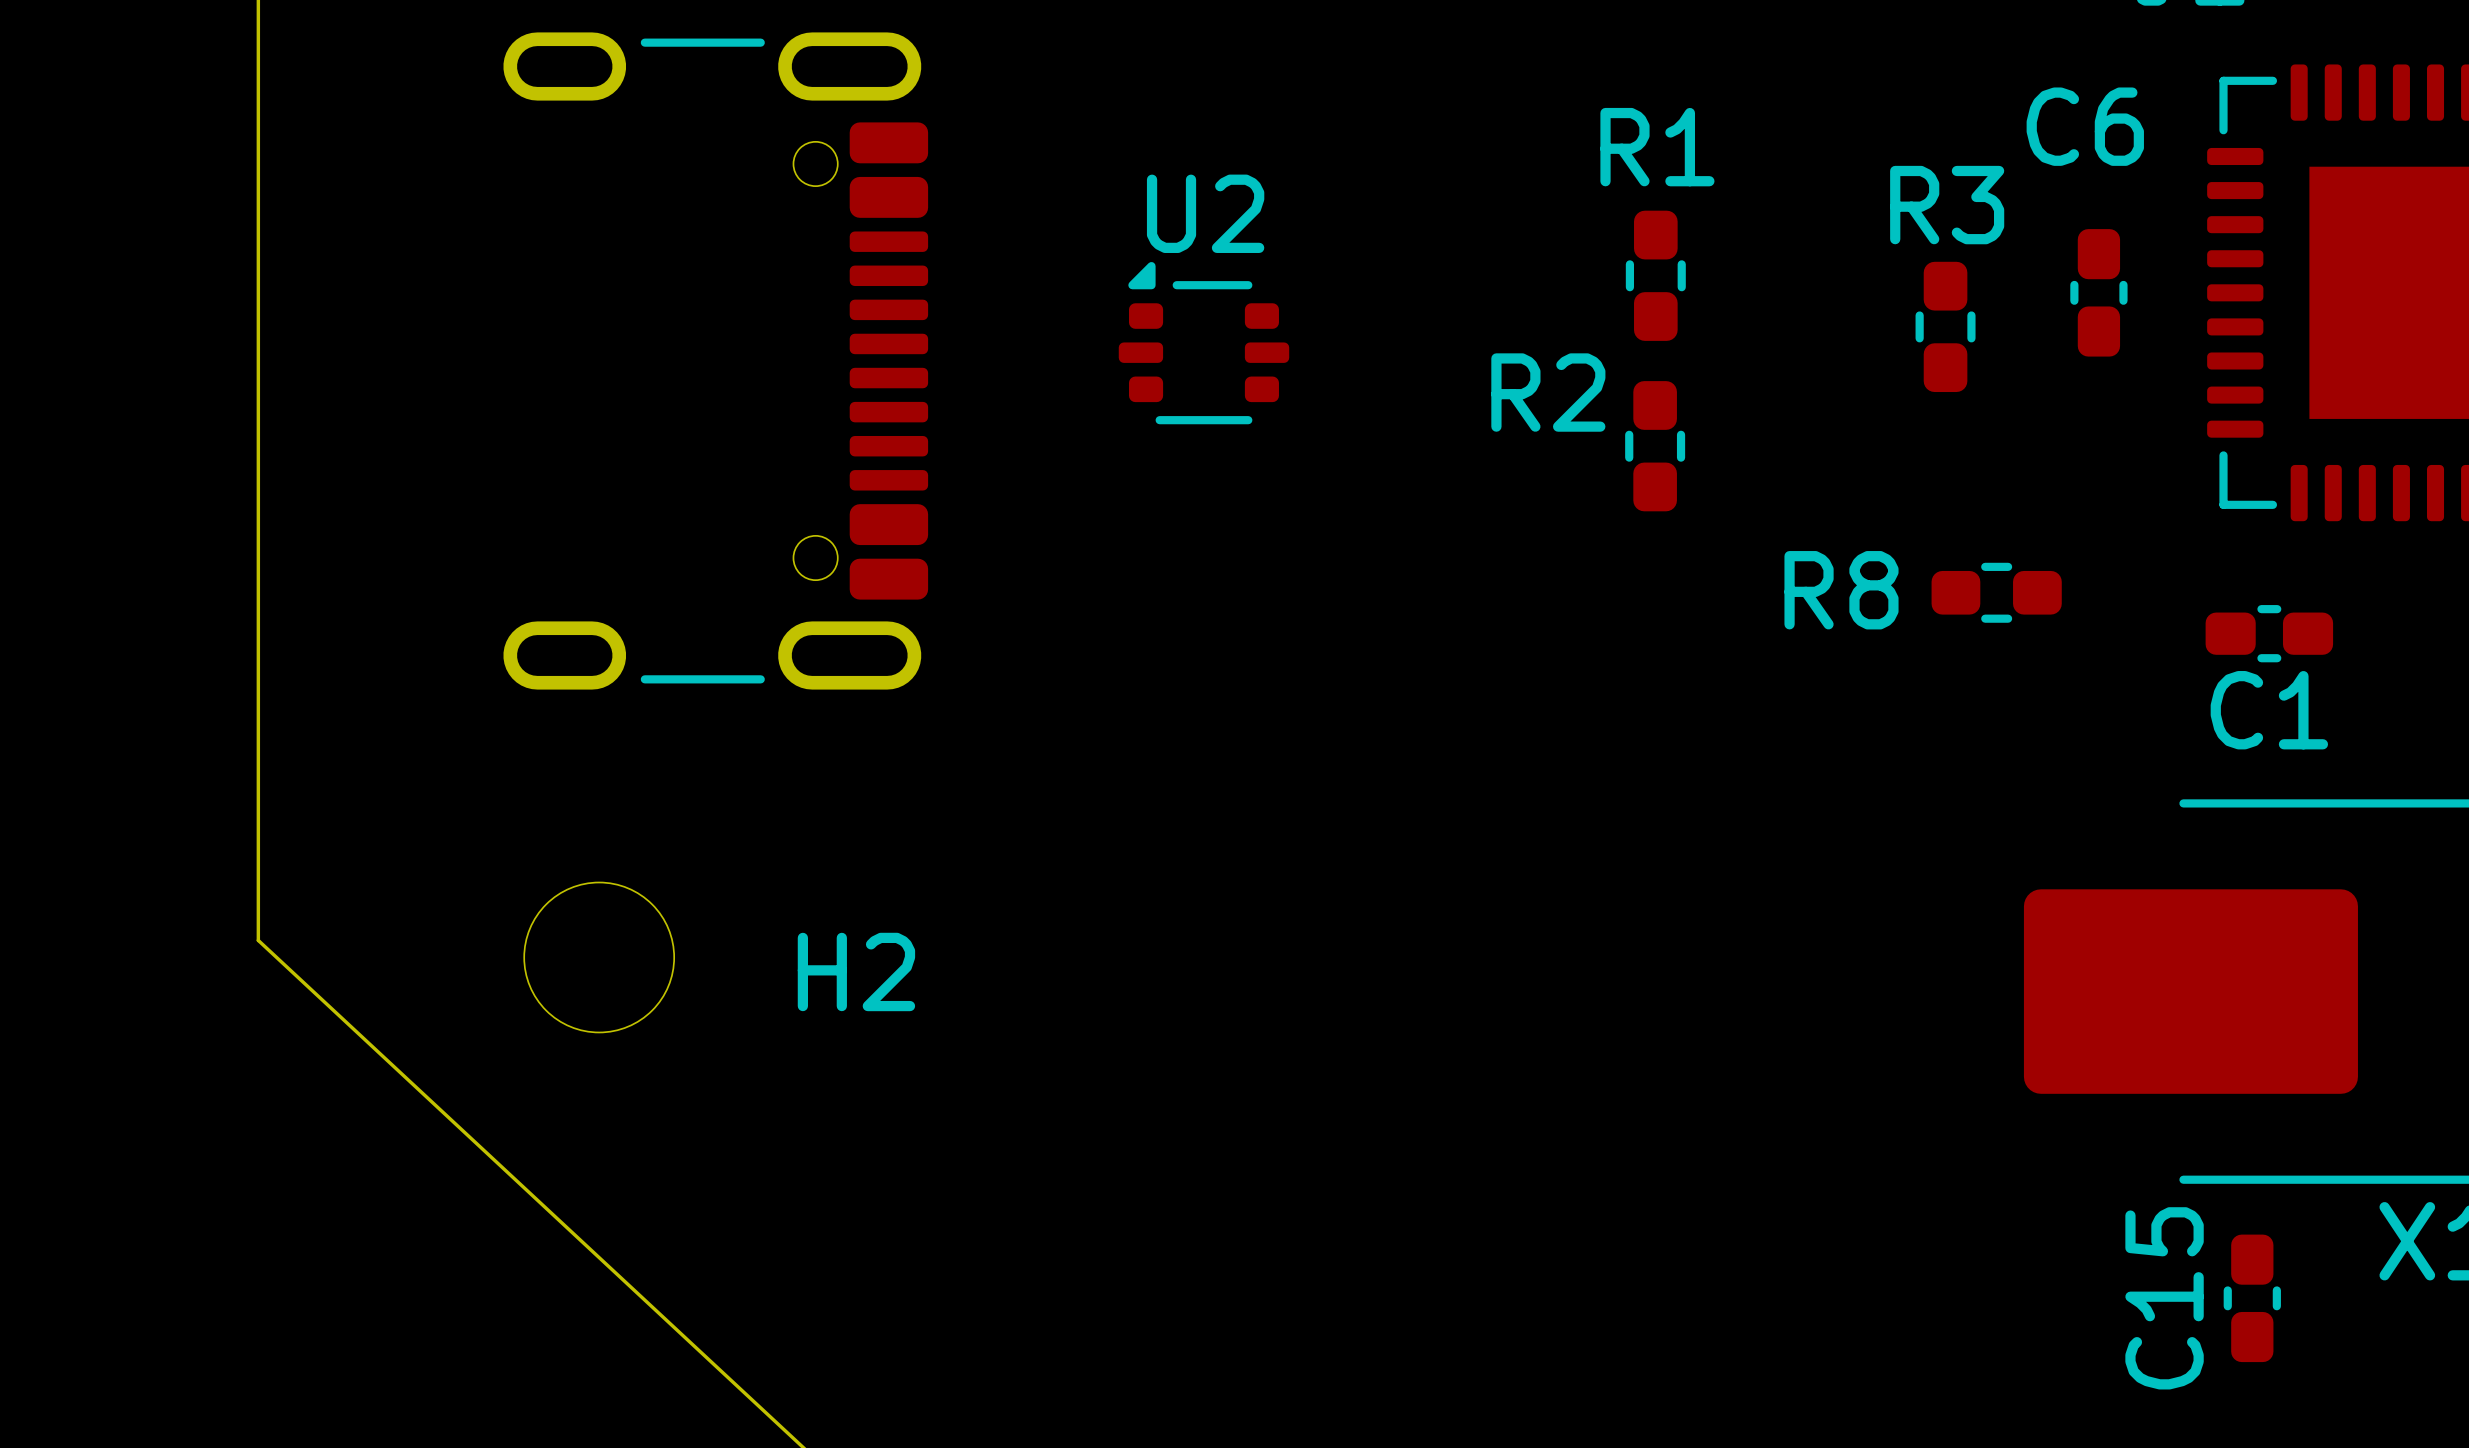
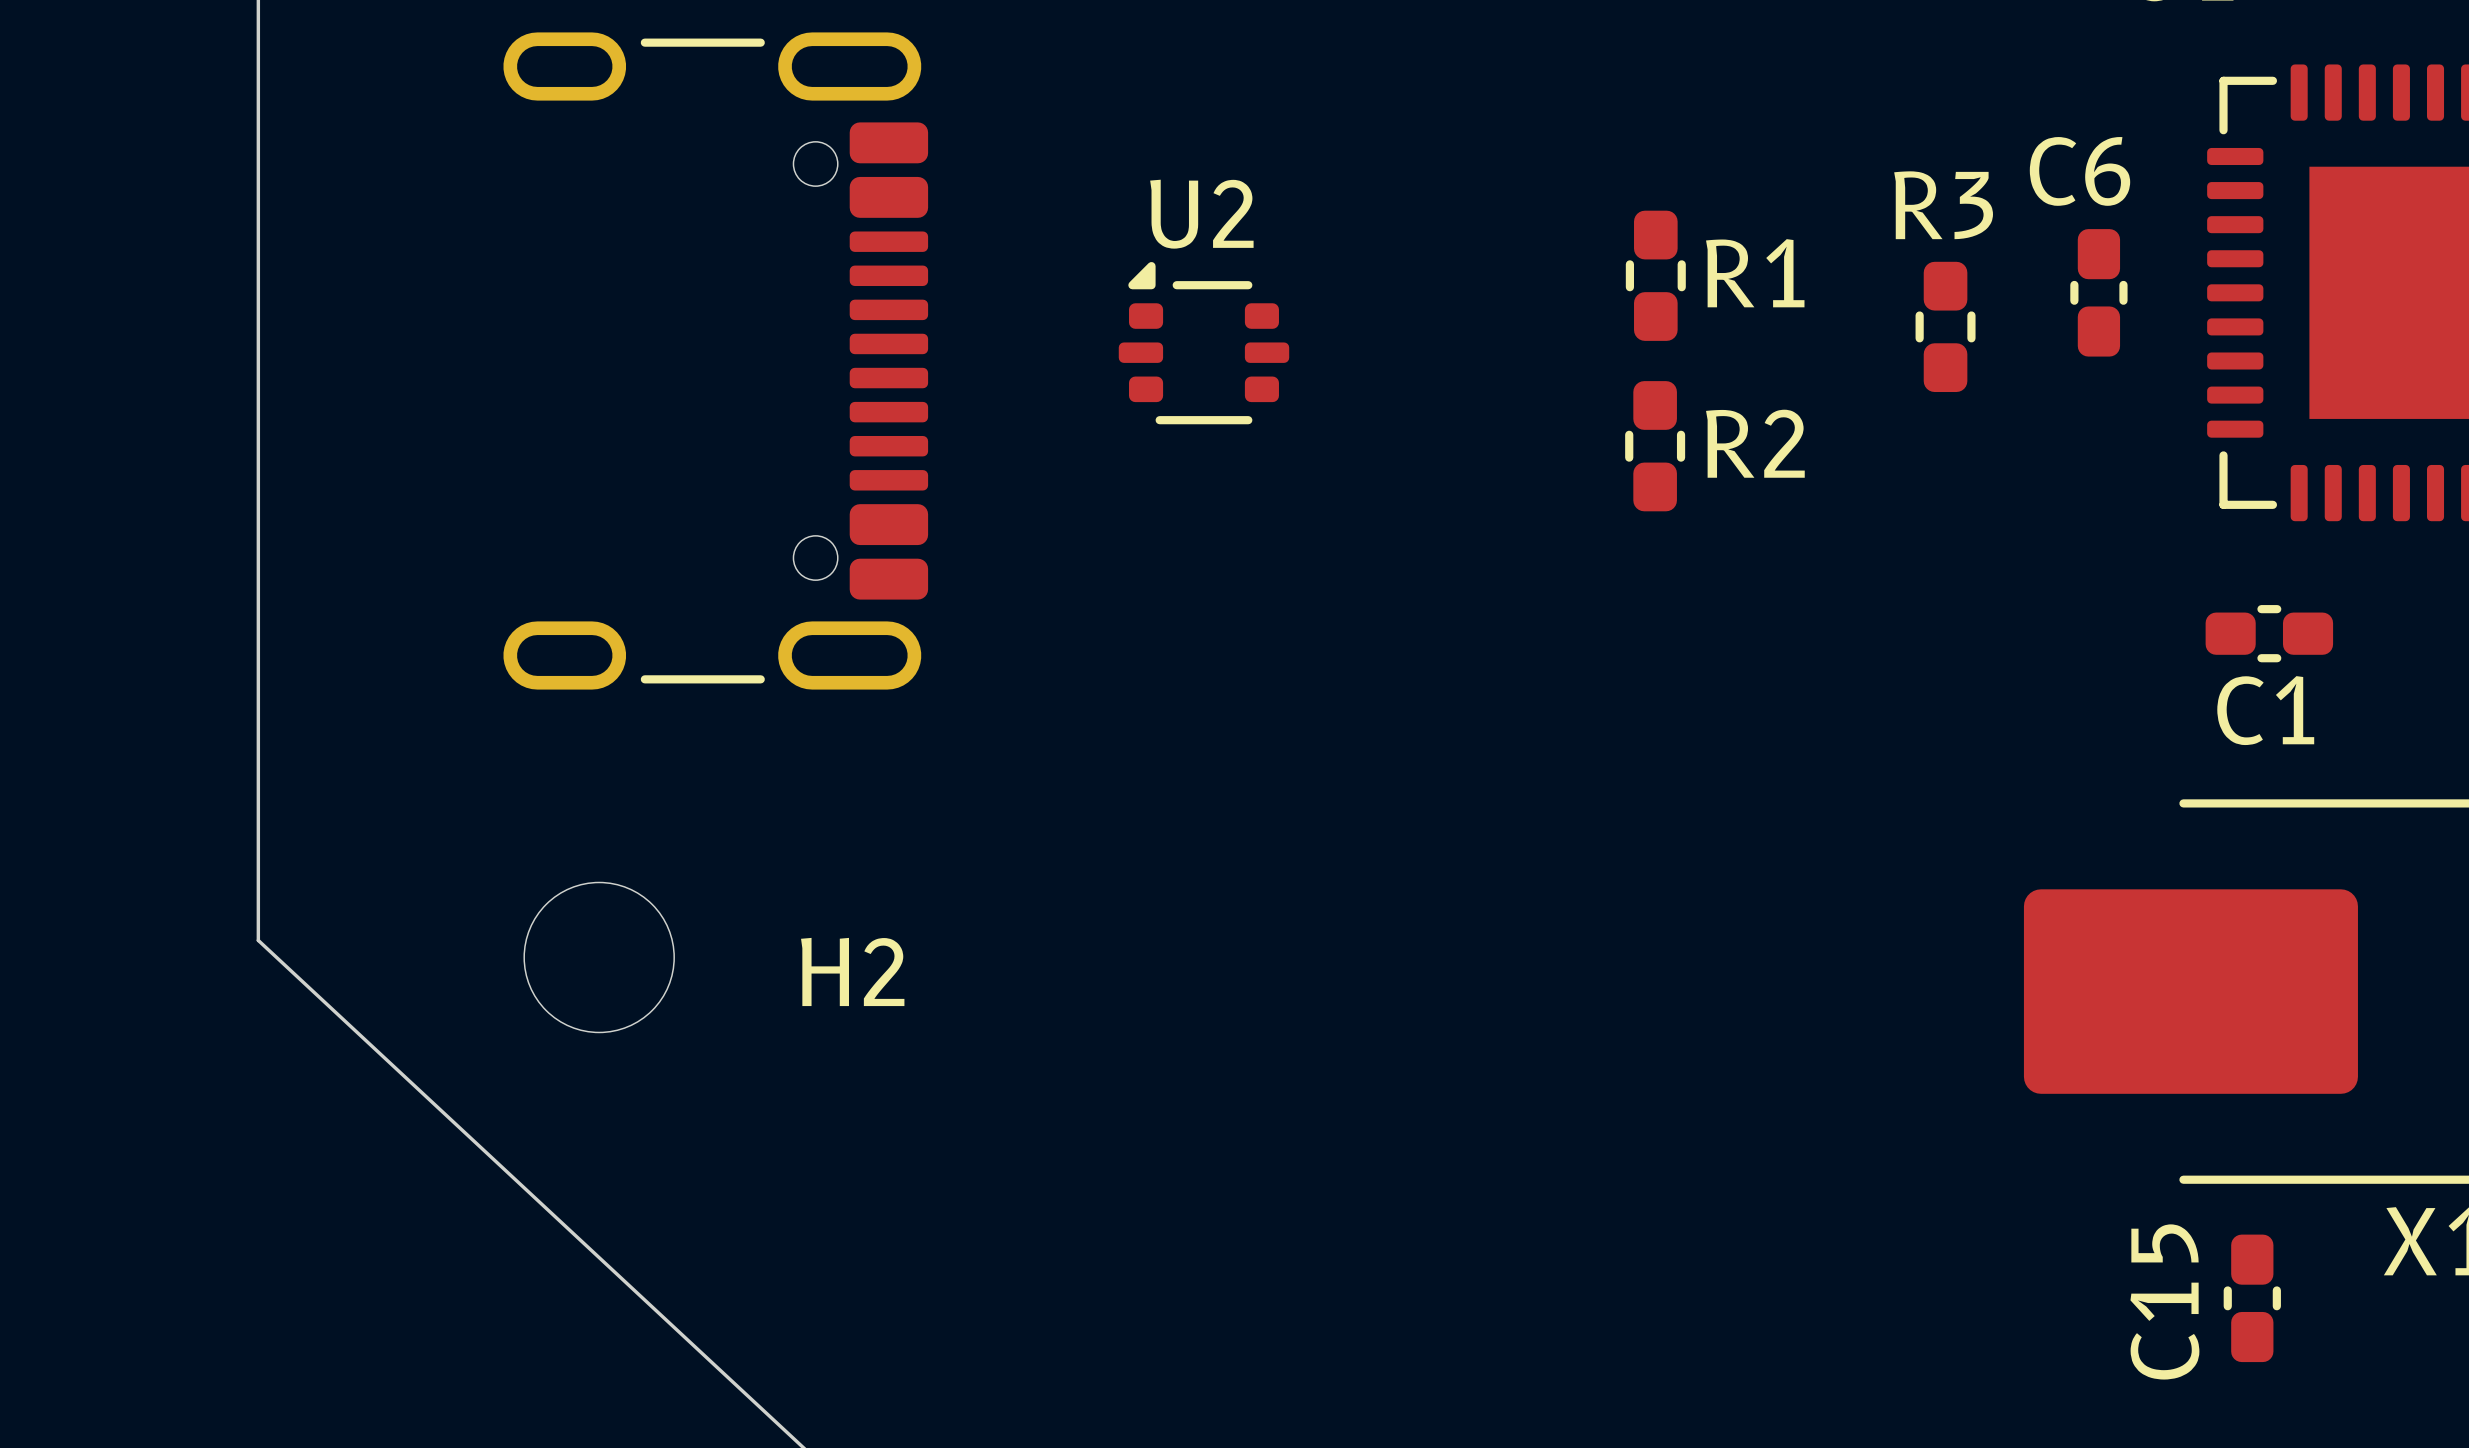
C6 name position: C6 (2085, 126) -> C6 (2079, 171)
R1 name position: R1 (1657, 147) -> R1 (1755, 273)
R2 name position: R2 (1548, 392) -> R2 (1755, 443)
R8: (1996, 592) -> none

